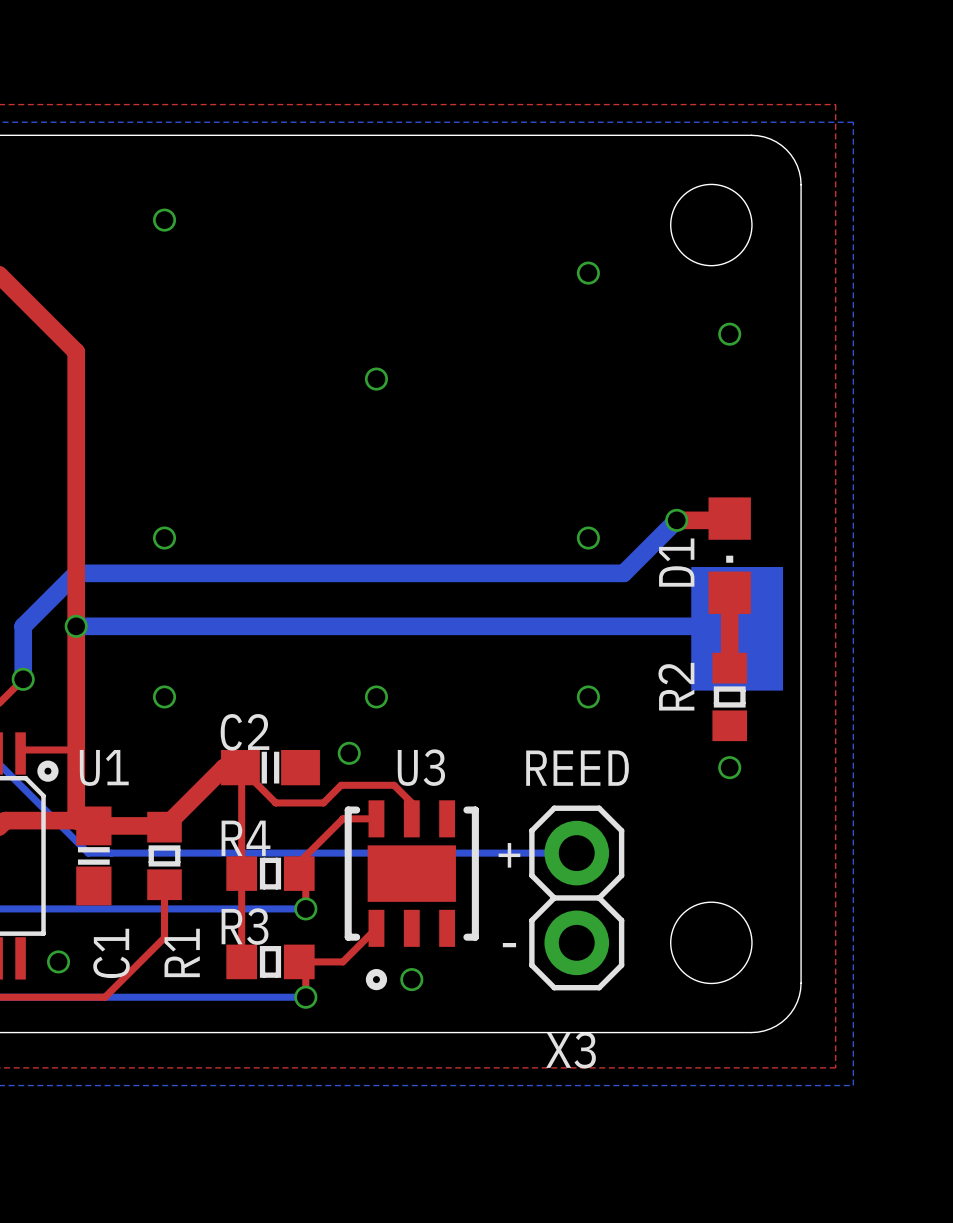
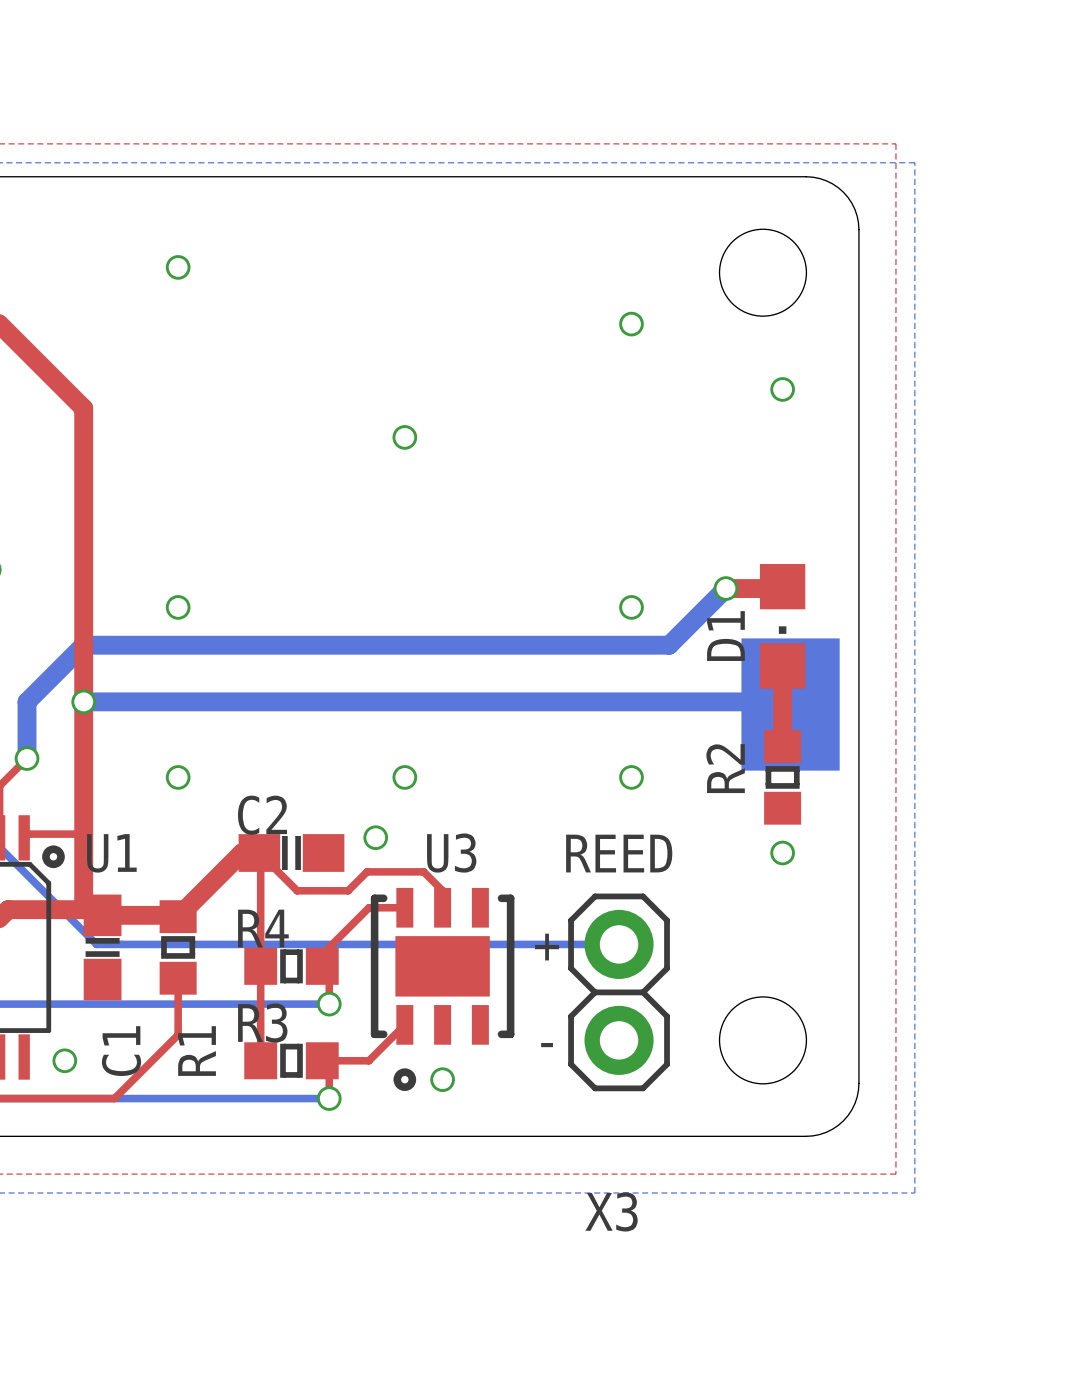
X3 name position: X3 (571, 1050) -> X3 (611, 1211)

